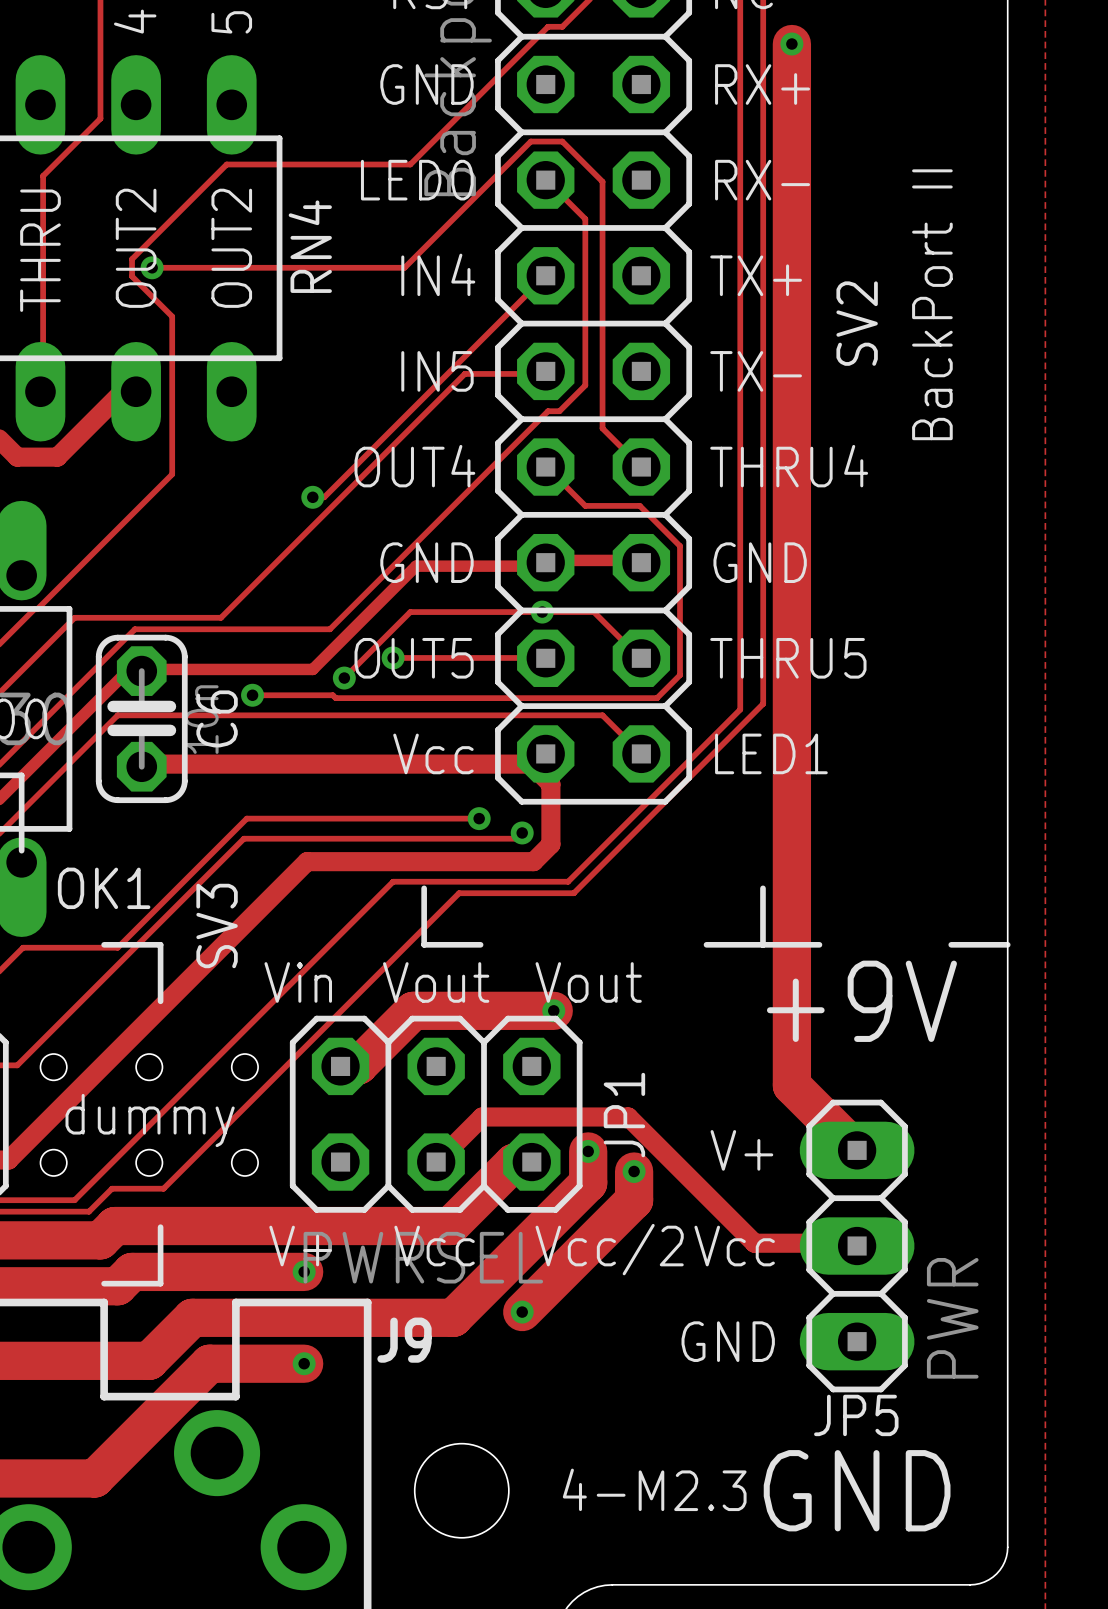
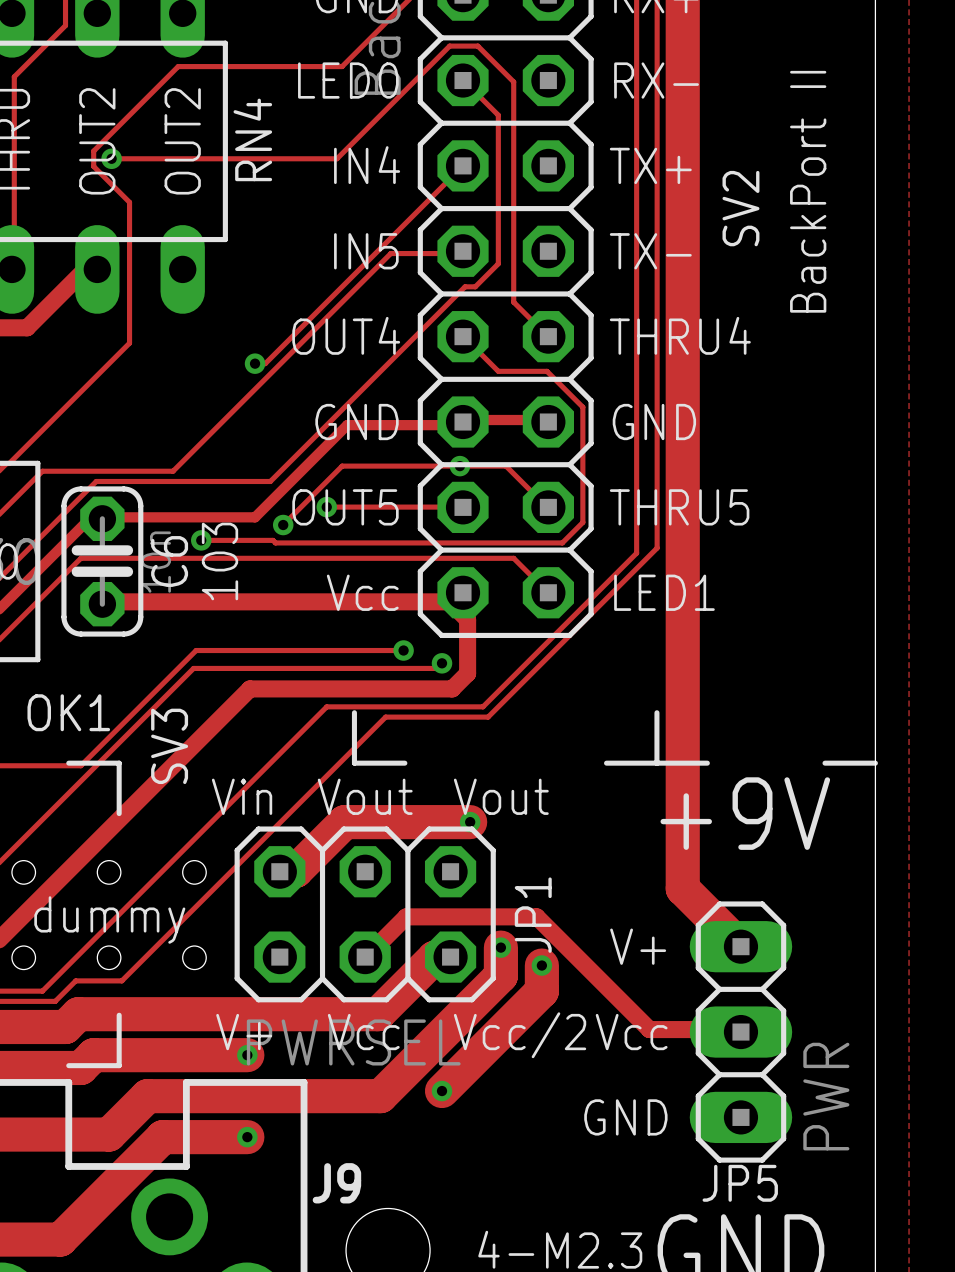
text: none -> 103 (220, 561)
J9 name position: J9 (404, 1340) -> J9 (336, 1183)

